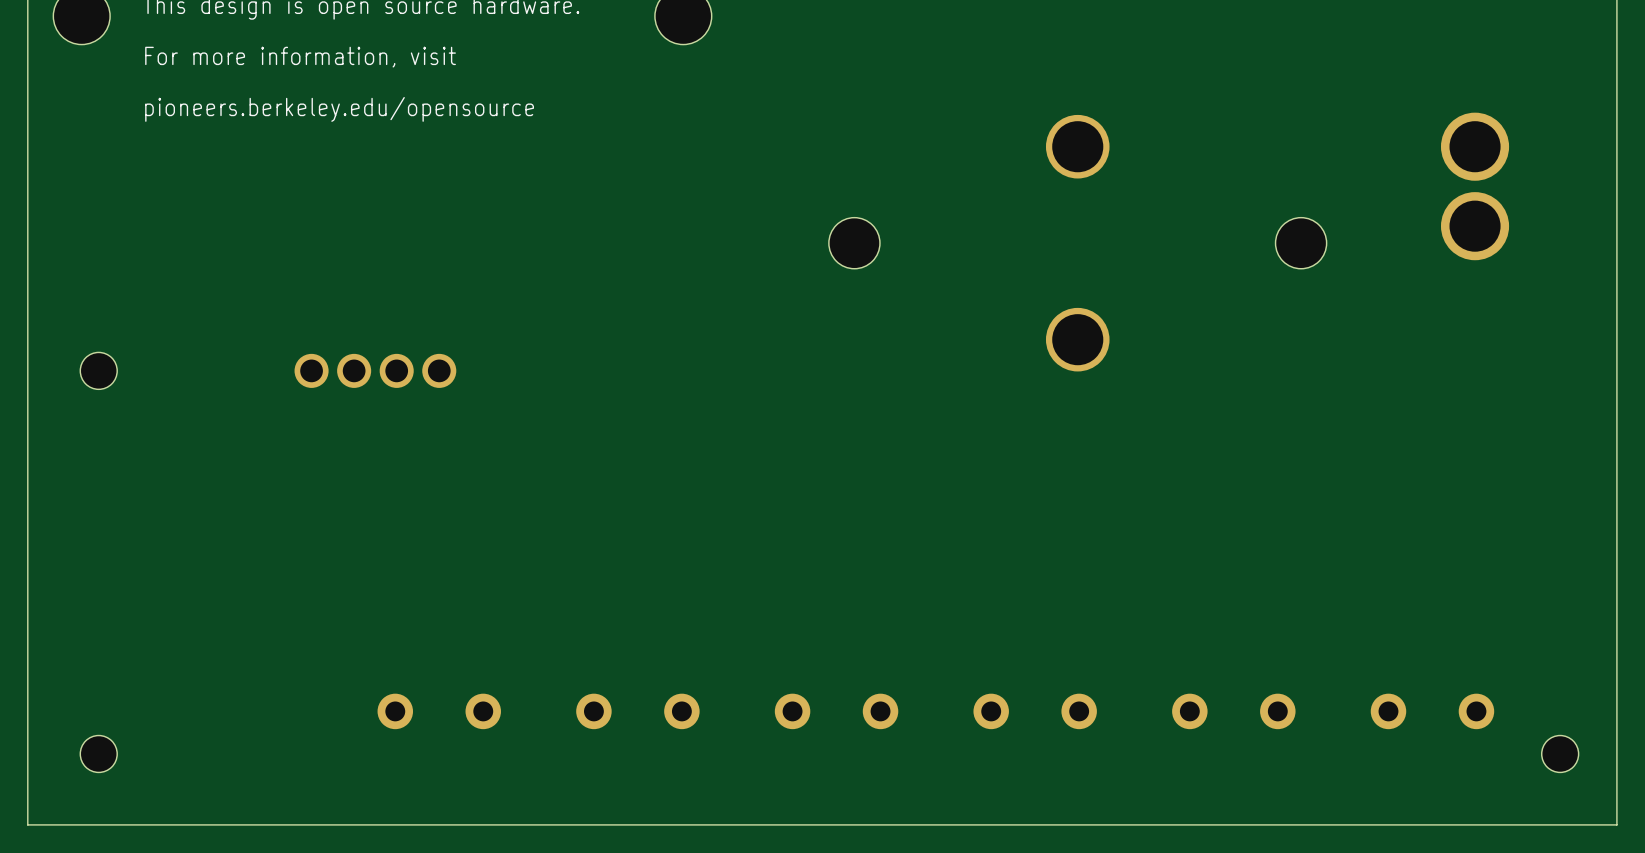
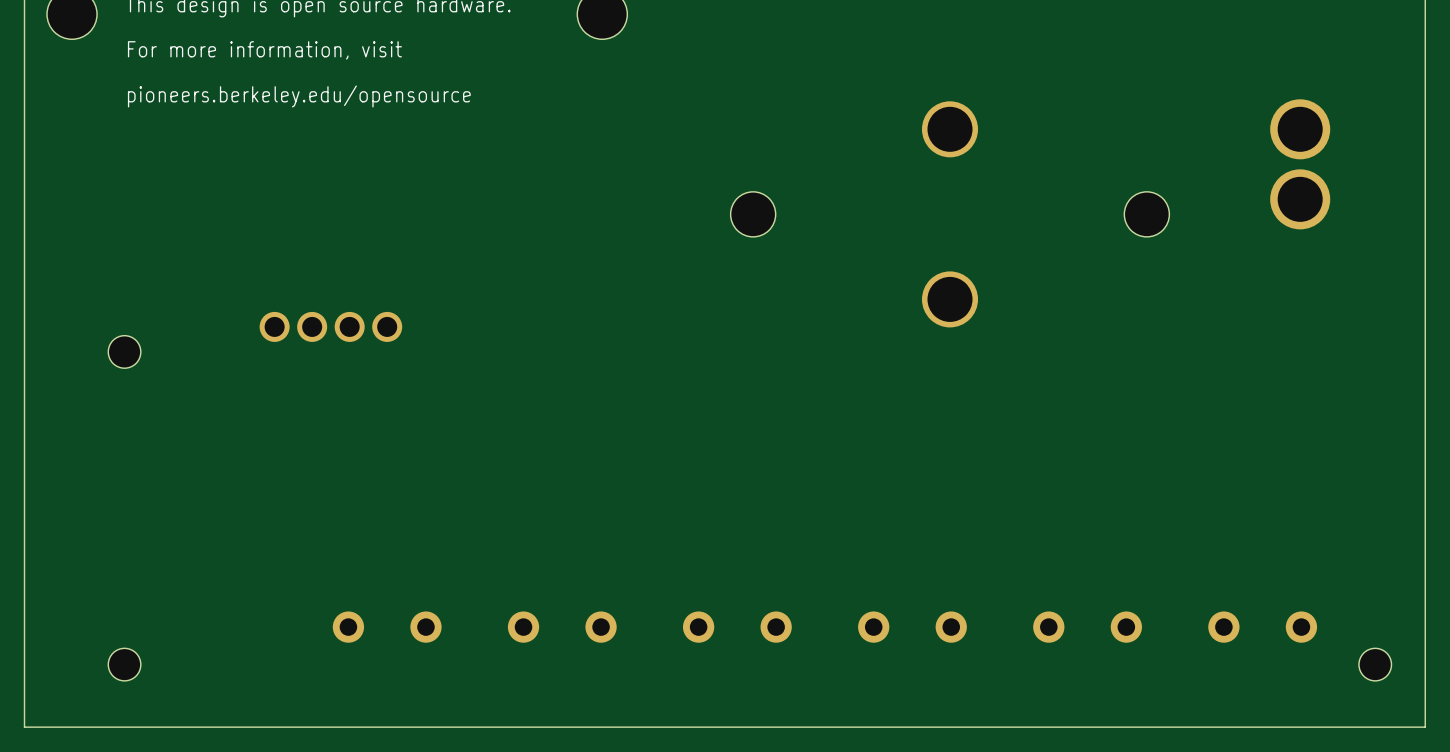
part position: (98, 370) -> (124, 351)
part position: (98, 753) -> (124, 664)

